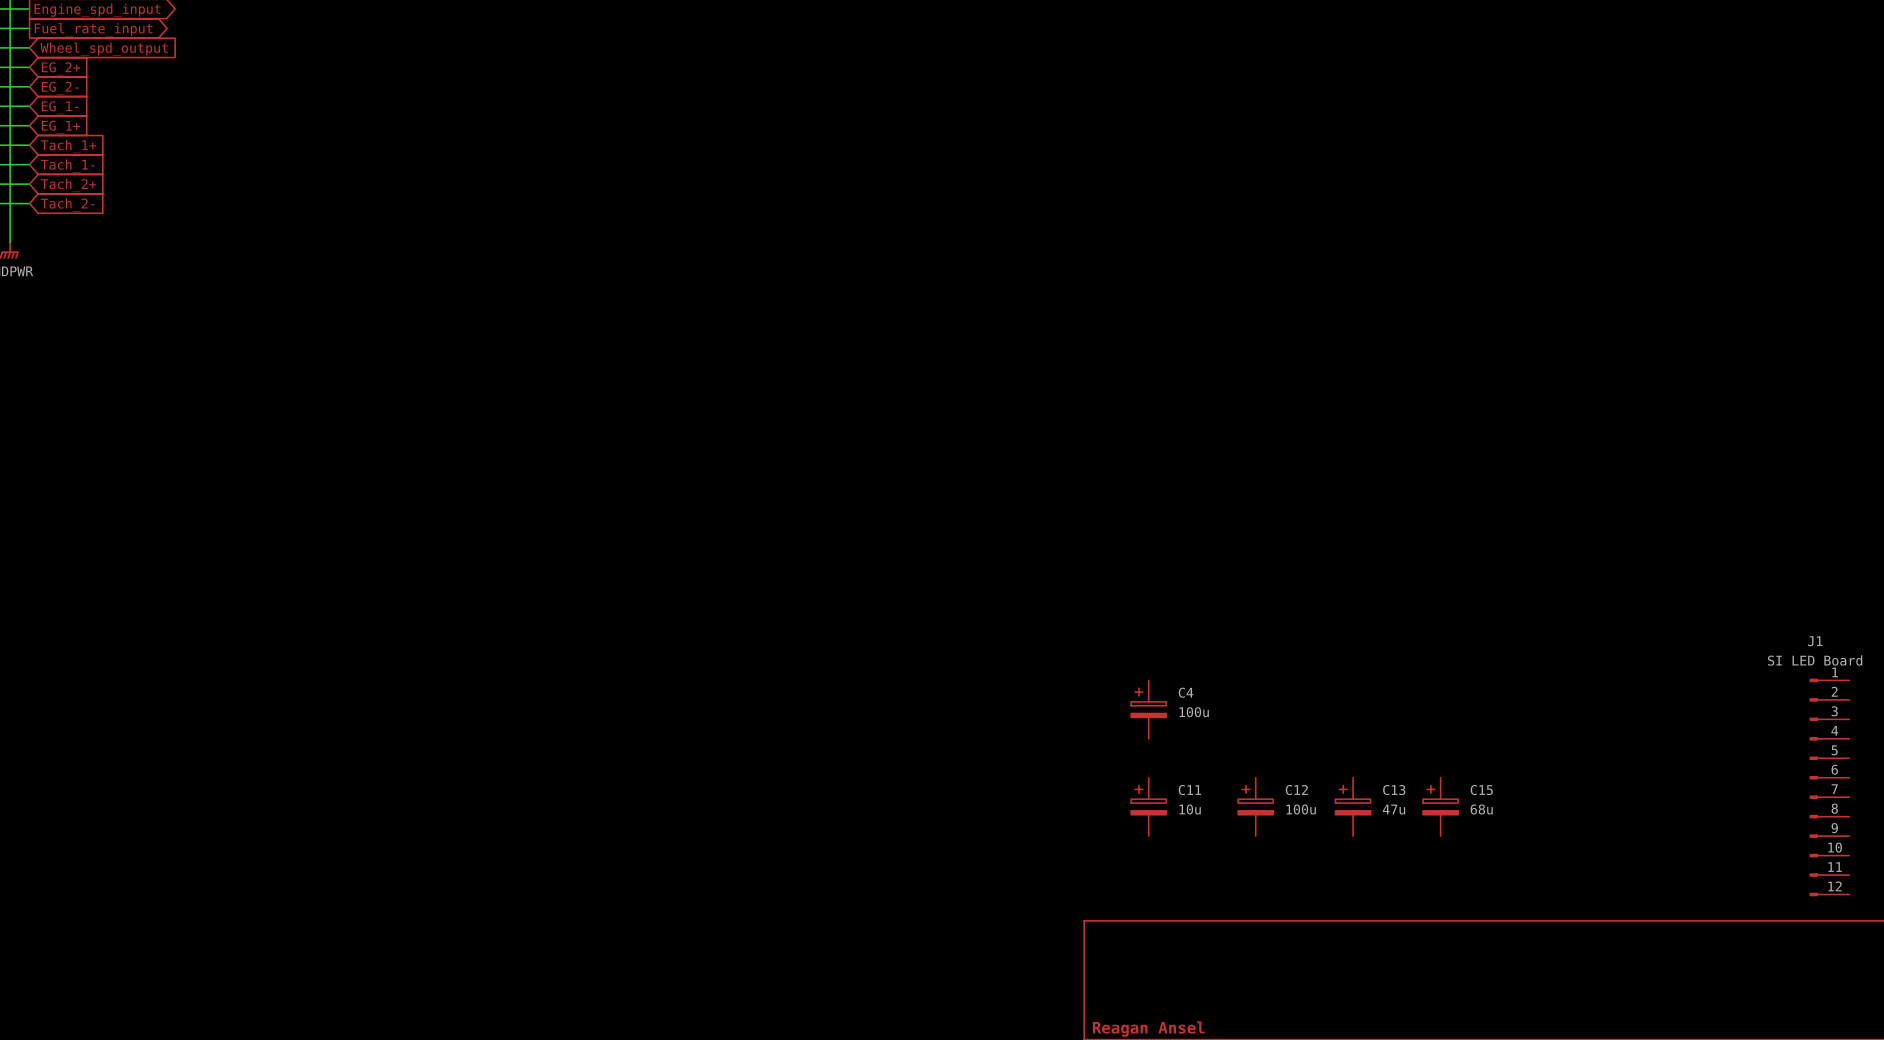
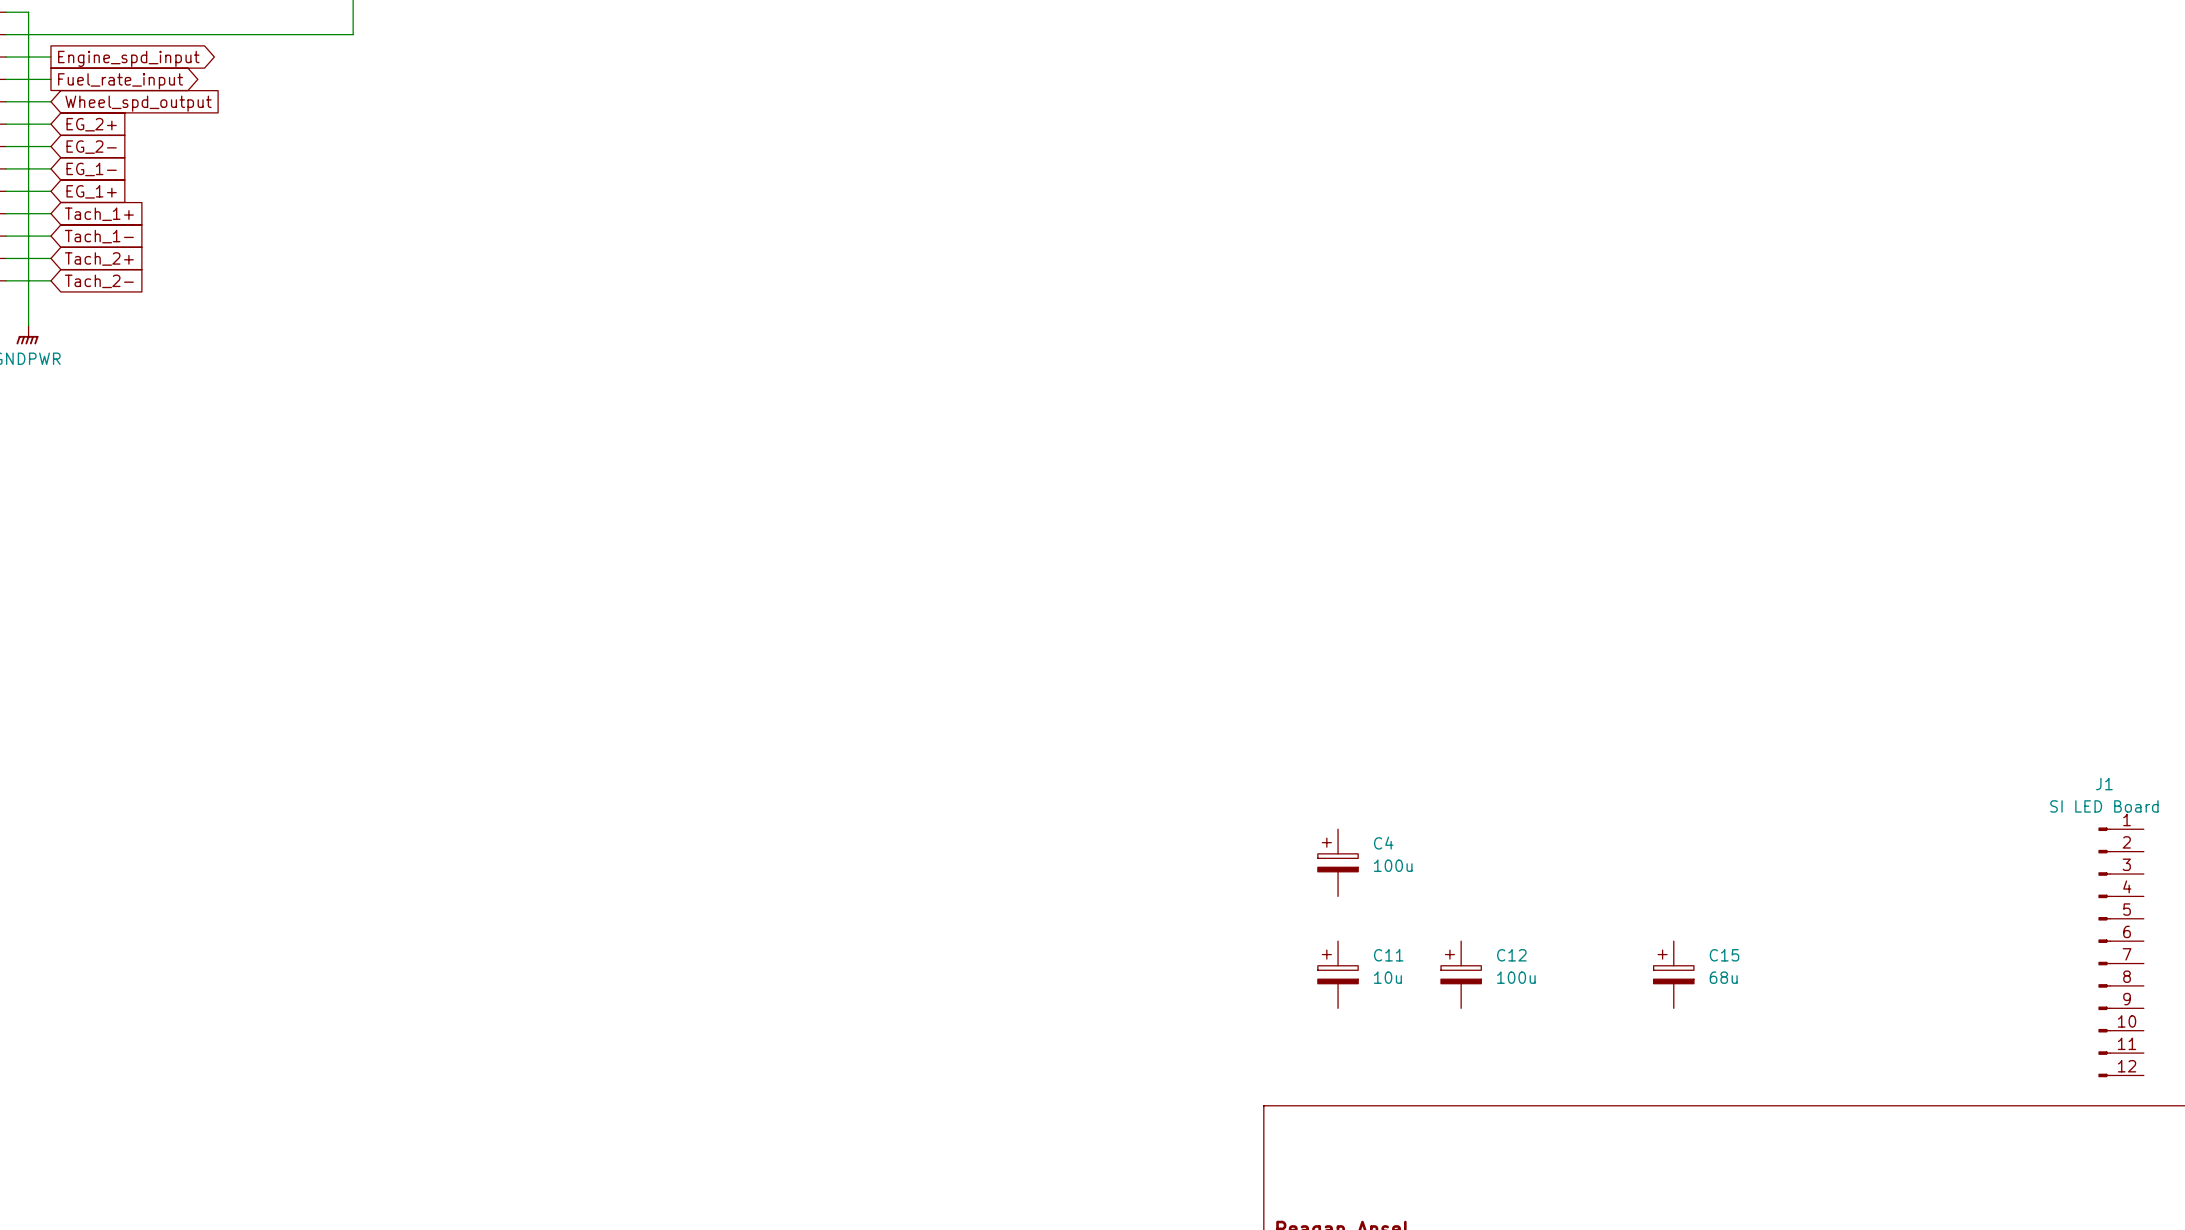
C13: 47u (1353, 806) -> none

